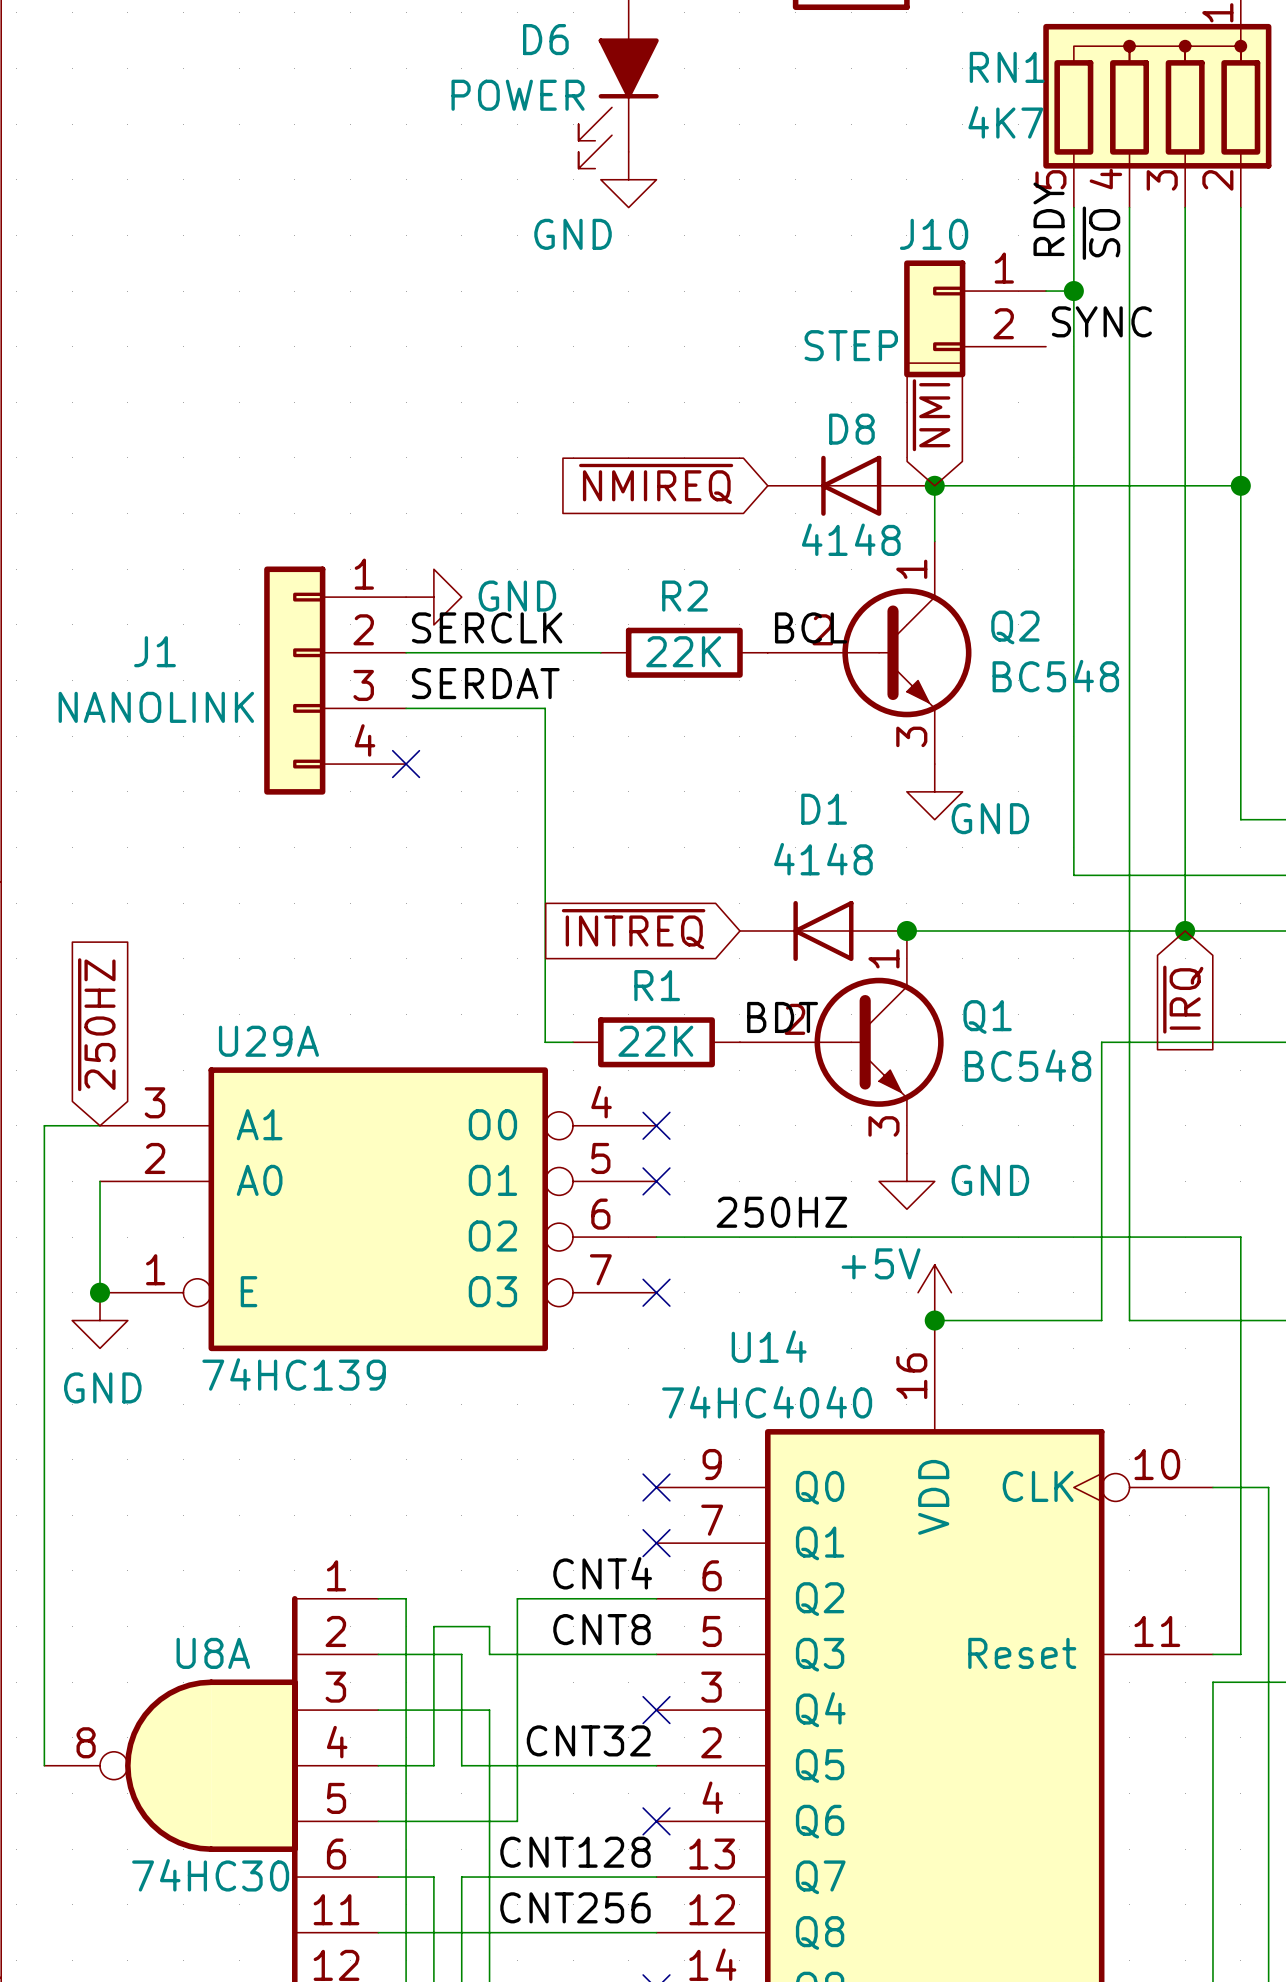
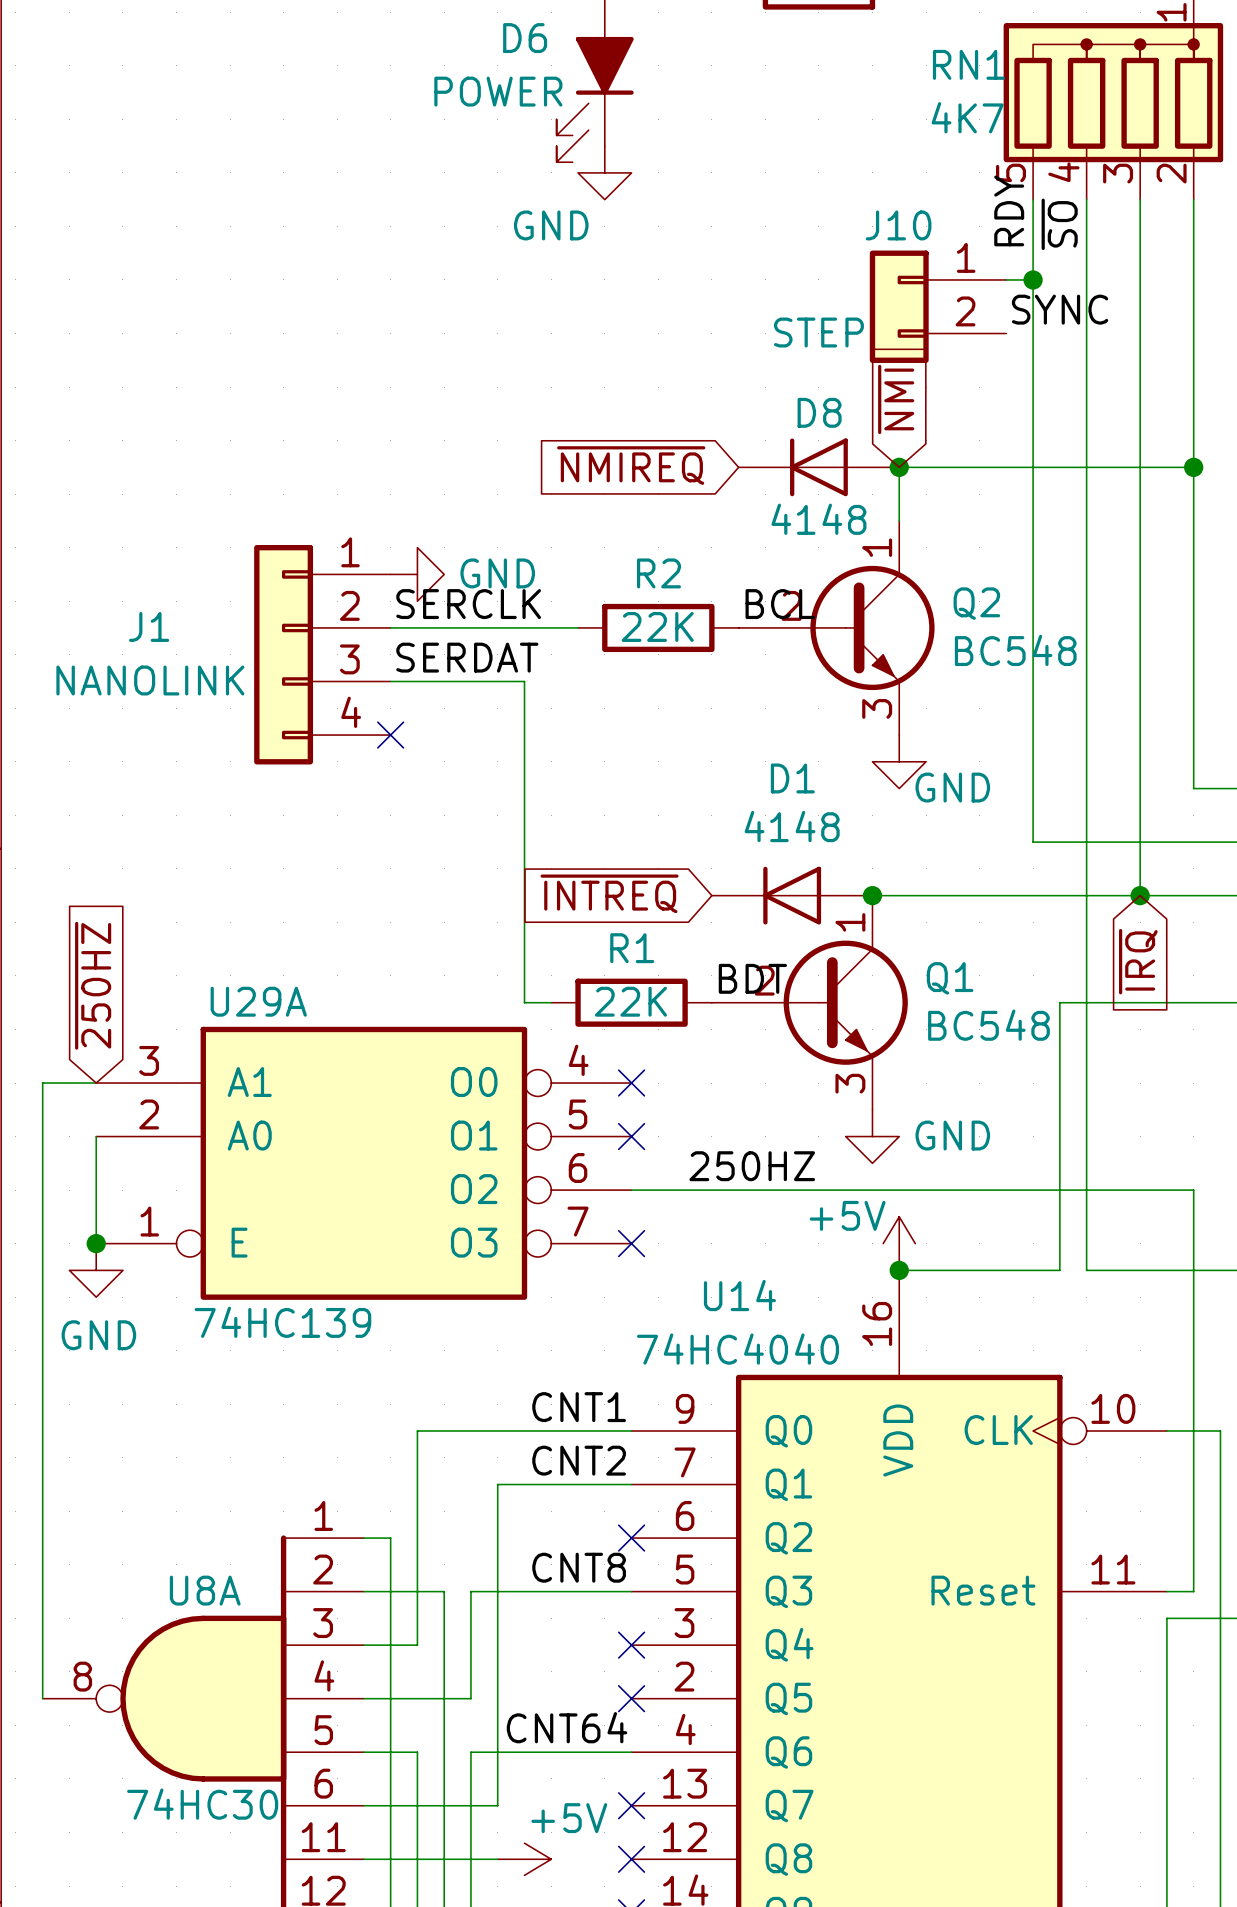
label: none -> CNT1 (579, 1407)
wire: none -> (631, 1431) (417, 1431) (417, 1564)
no-connect mark: (656, 1487) -> none
no-connect mark: (656, 1543) -> none
label: CNT4 (602, 1573) -> CNT2 (579, 1460)
wire: (517, 1598) (656, 1598) -> (497, 1538) (497, 1484) (631, 1484)
no-connect mark: none -> (631, 1538)
wire: (433, 1626) (489, 1626) (489, 1654) -> (470, 1645) (470, 1591)
wire: (489, 1710) (433, 1710) (433, 1765) -> (417, 1752) (417, 1805) (444, 1805) (444, 1698) (417, 1698)
label: CNT32 (588, 1740) -> none
wire: (656, 1765) (489, 1765) (489, 1821) (433, 1821) -> none
no-connect mark: none -> (631, 1698)
label: none -> CNT64 (567, 1727)
no-connect mark: (656, 1821) -> none
label: CNT128 (575, 1852) -> none
wire: (517, 1877) (656, 1877) -> (497, 1805) (497, 1752) (631, 1752)
no-connect mark: none -> (631, 1805)
label: CNT256 (575, 1907) -> none
wire: (517, 1932) (656, 1932) -> none
power symbol: none -> +5V (524, 1859)
no-connect mark: none -> (631, 1859)

